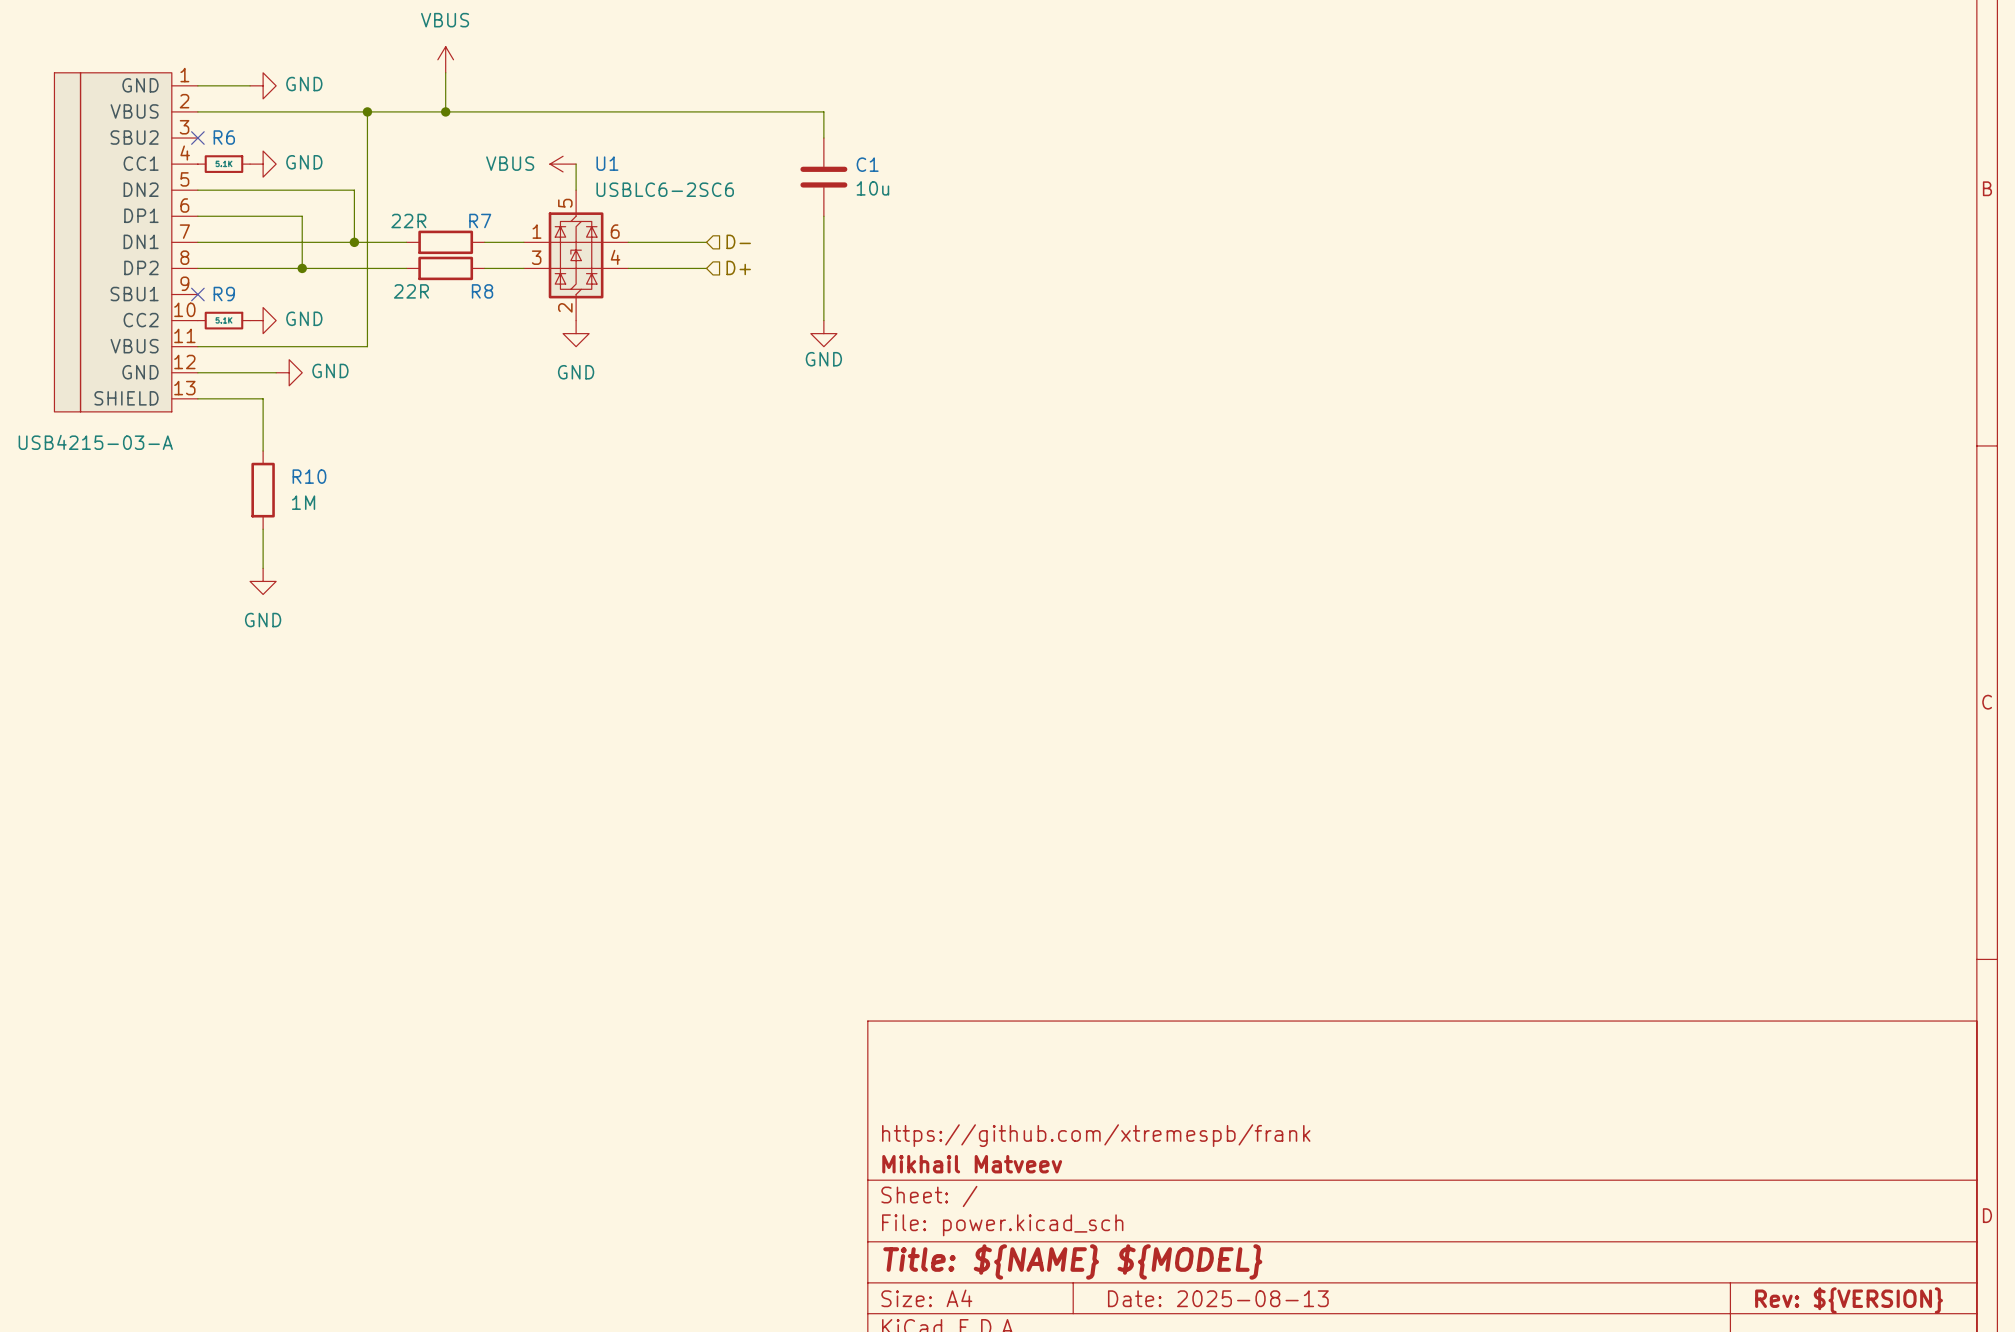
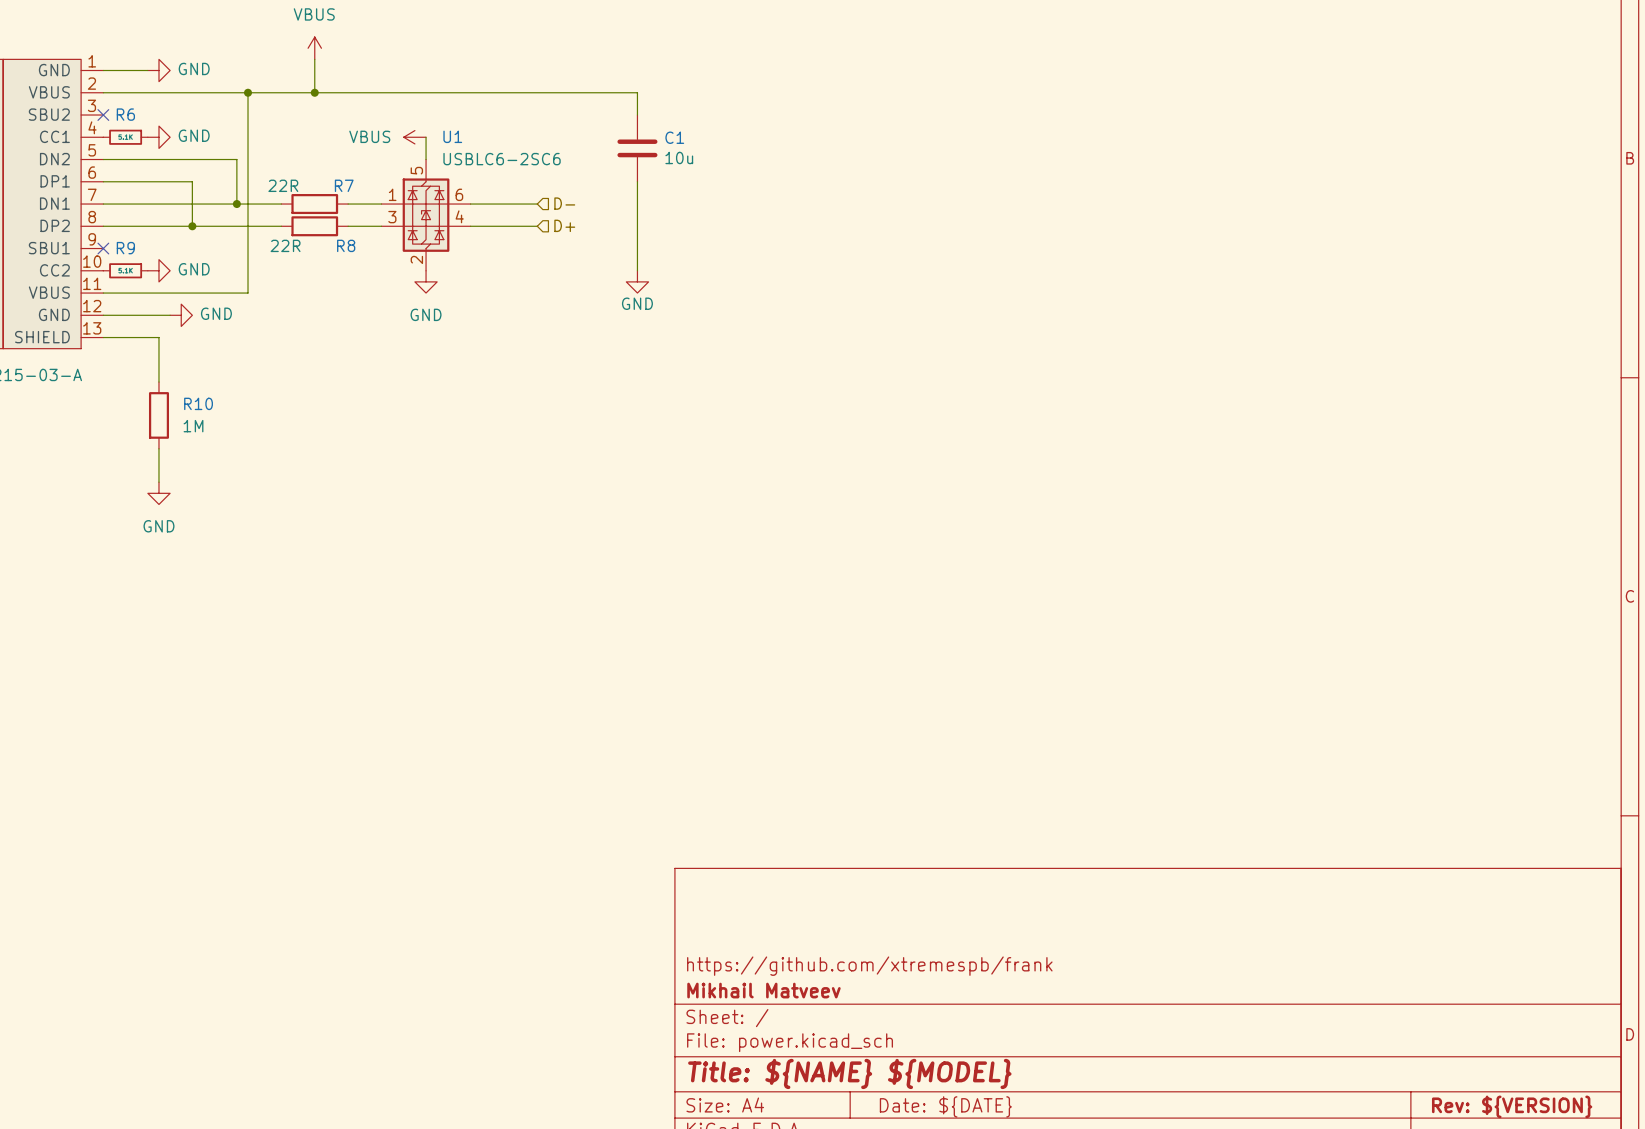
title block: Date: 2025-08-13 (1218, 1298) -> Date: ${DATE} (945, 1106)

